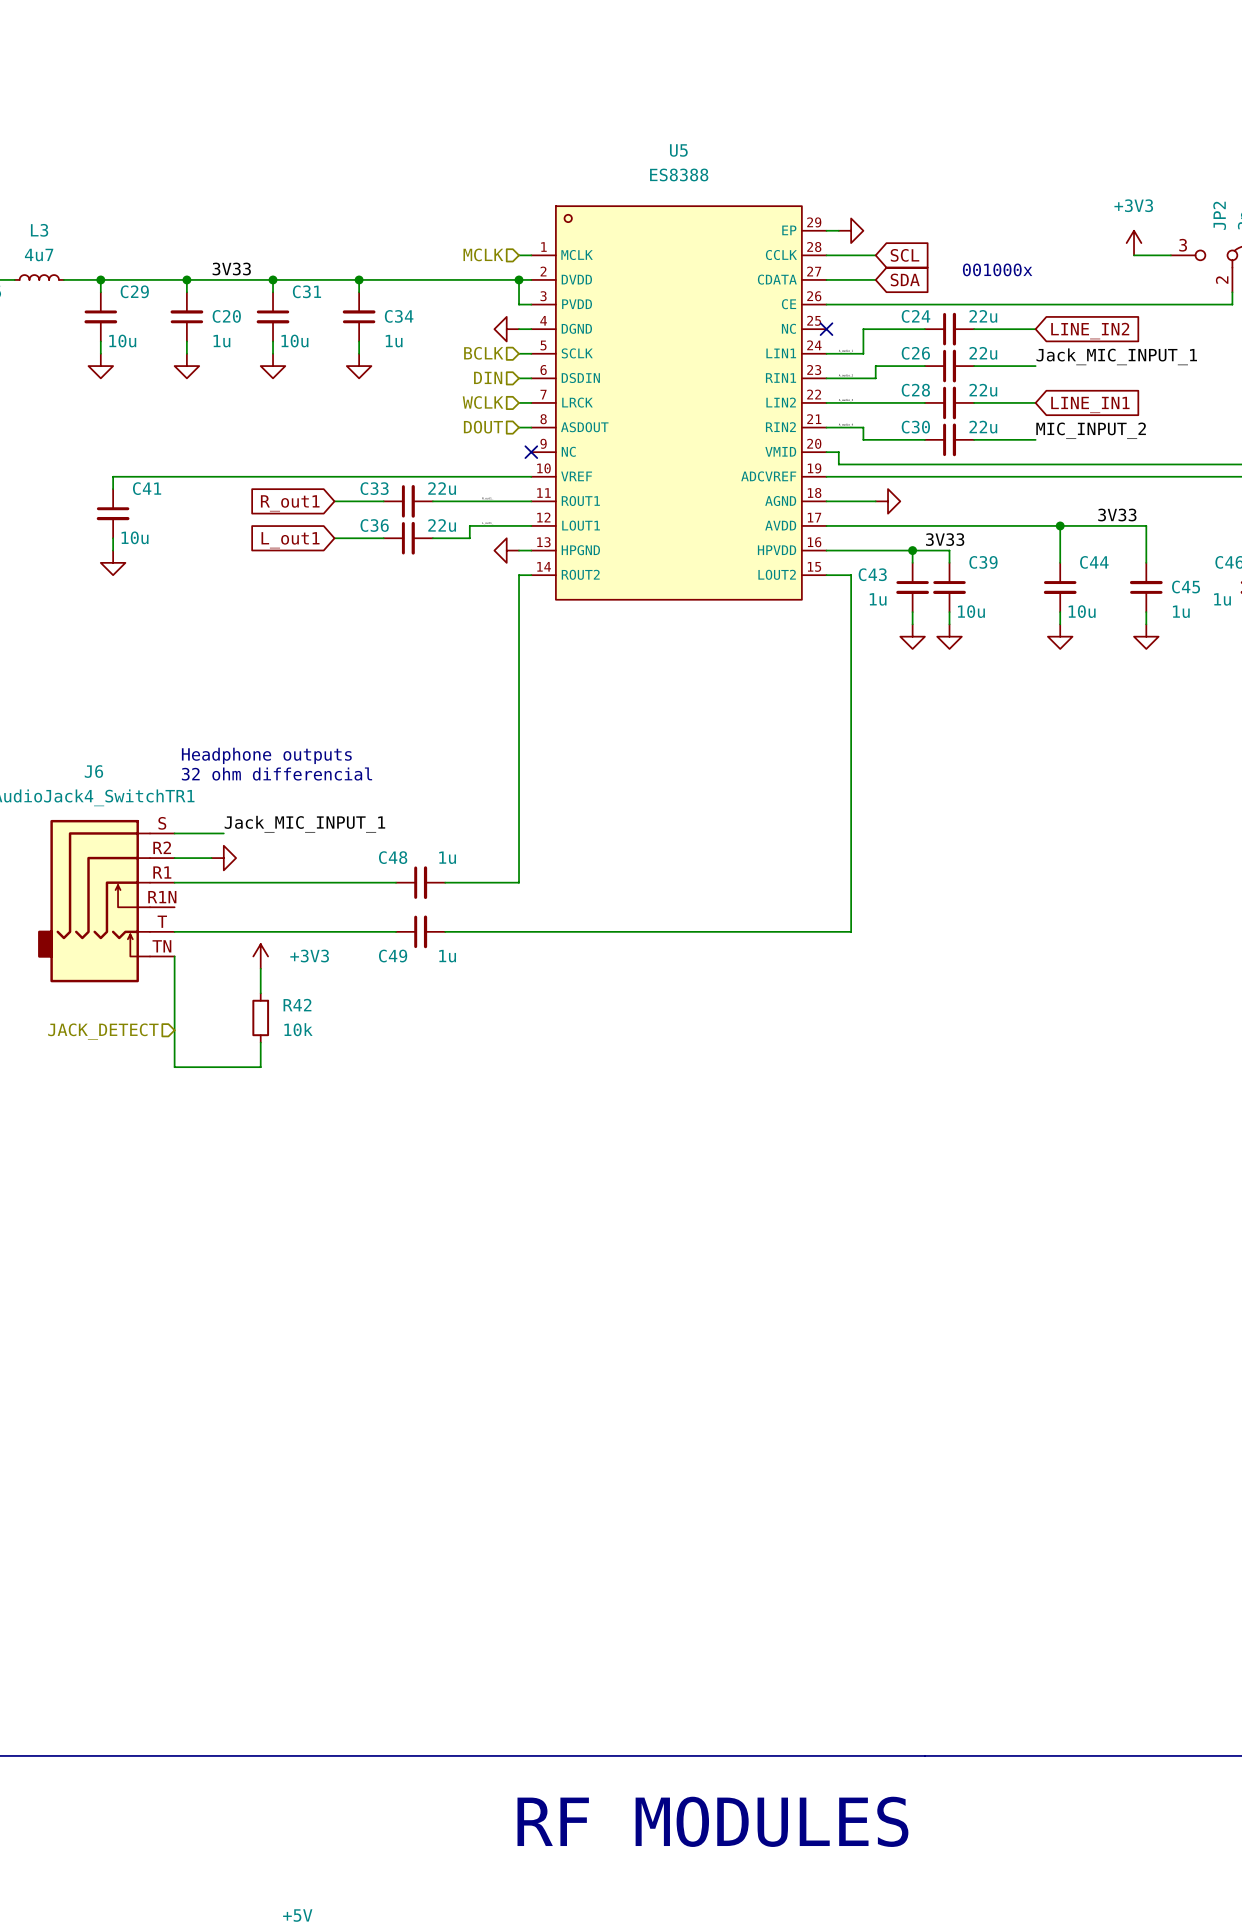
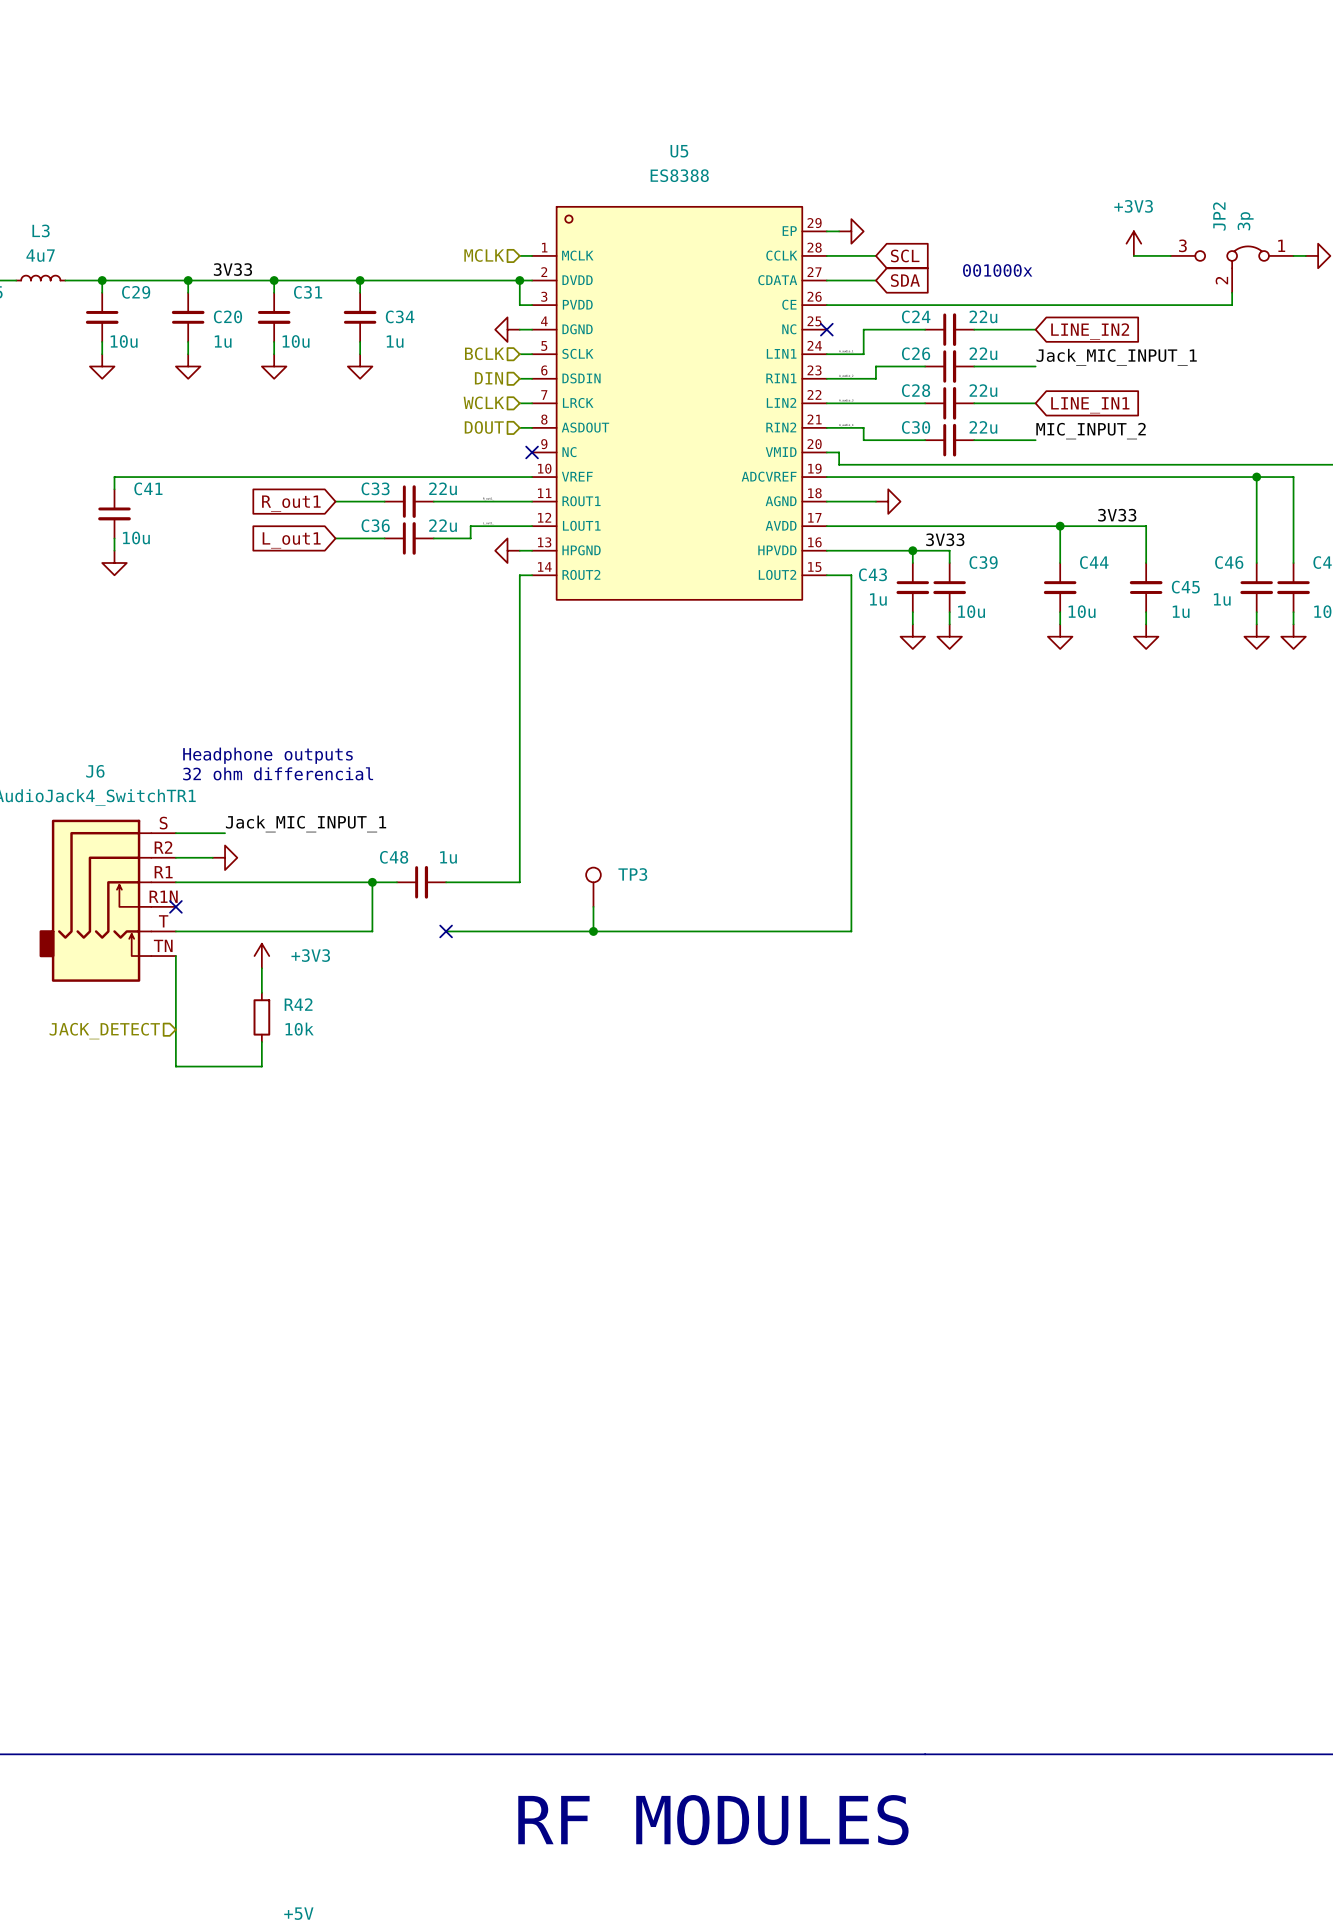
junction: none -> (372, 882)
TP3: none -> (593, 887)
no-connect mark: none -> (175, 906)
wire: none -> (593, 906) (593, 931)
wire: (371, 931) (396, 931) -> (372, 931) (372, 882)
C49: 1u (420, 931) -> none
no-connect mark: none -> (446, 931)
junction: none -> (593, 931)

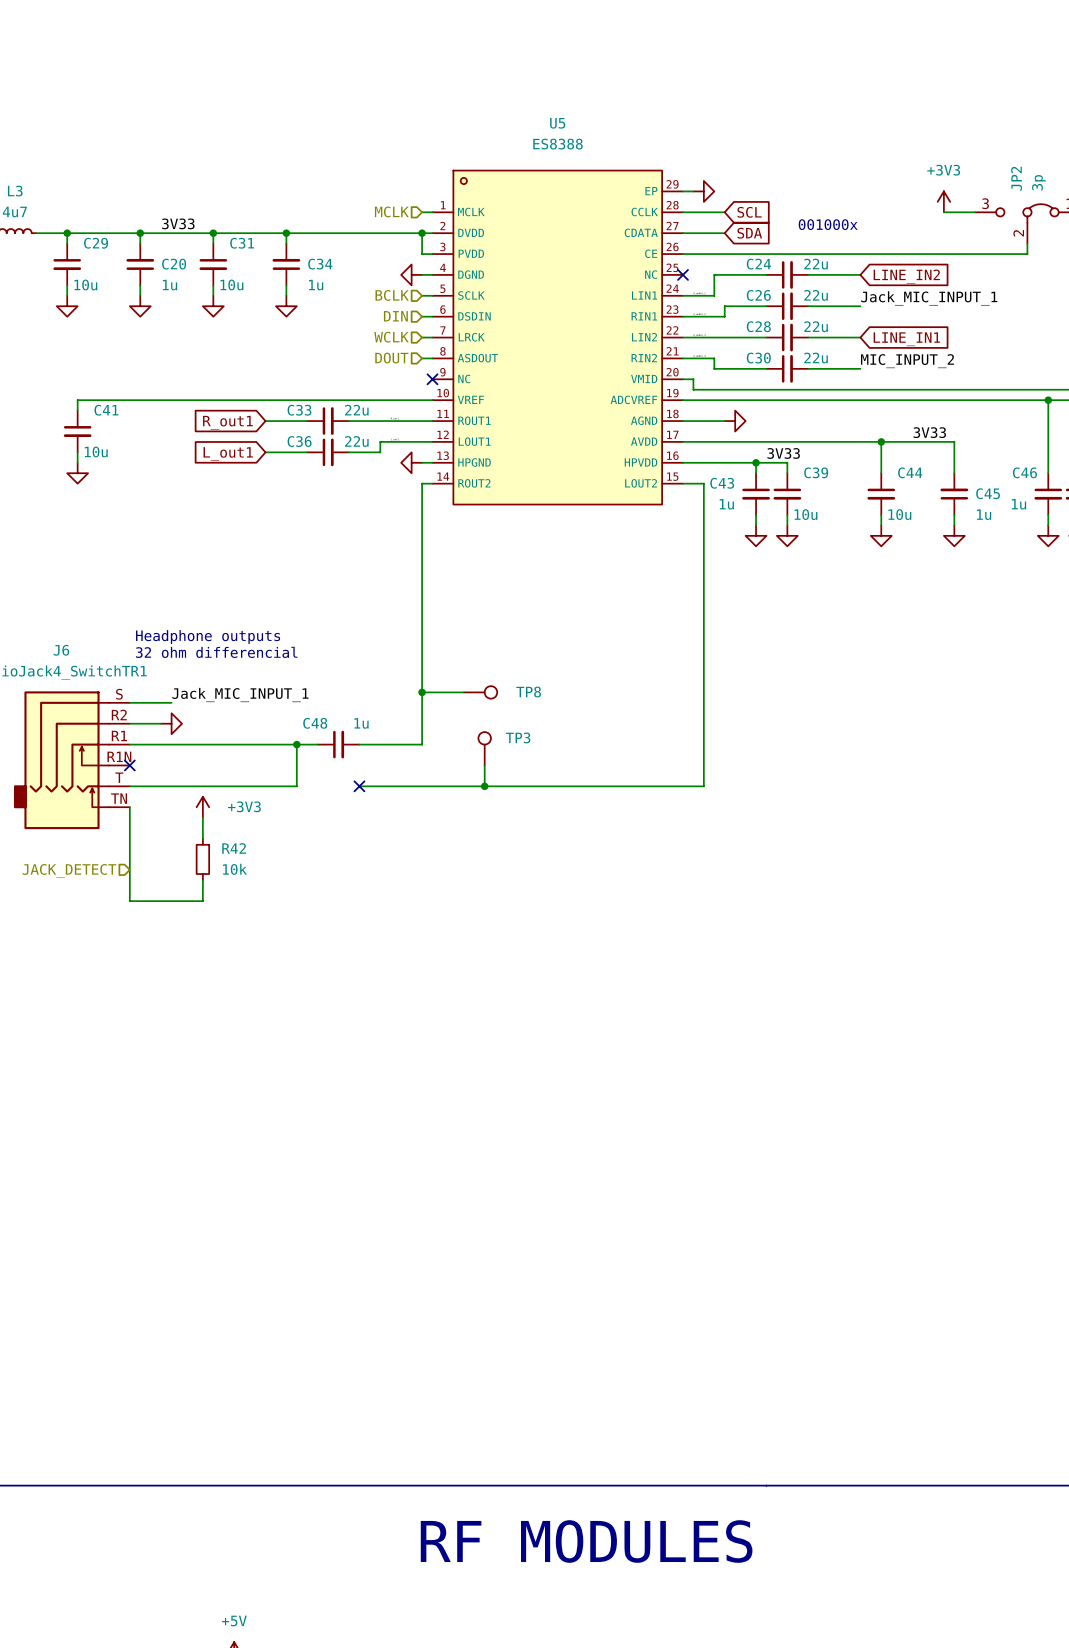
wire: none -> (422, 692) (463, 692)
junction: none -> (422, 692)
TP8: none -> (480, 692)

